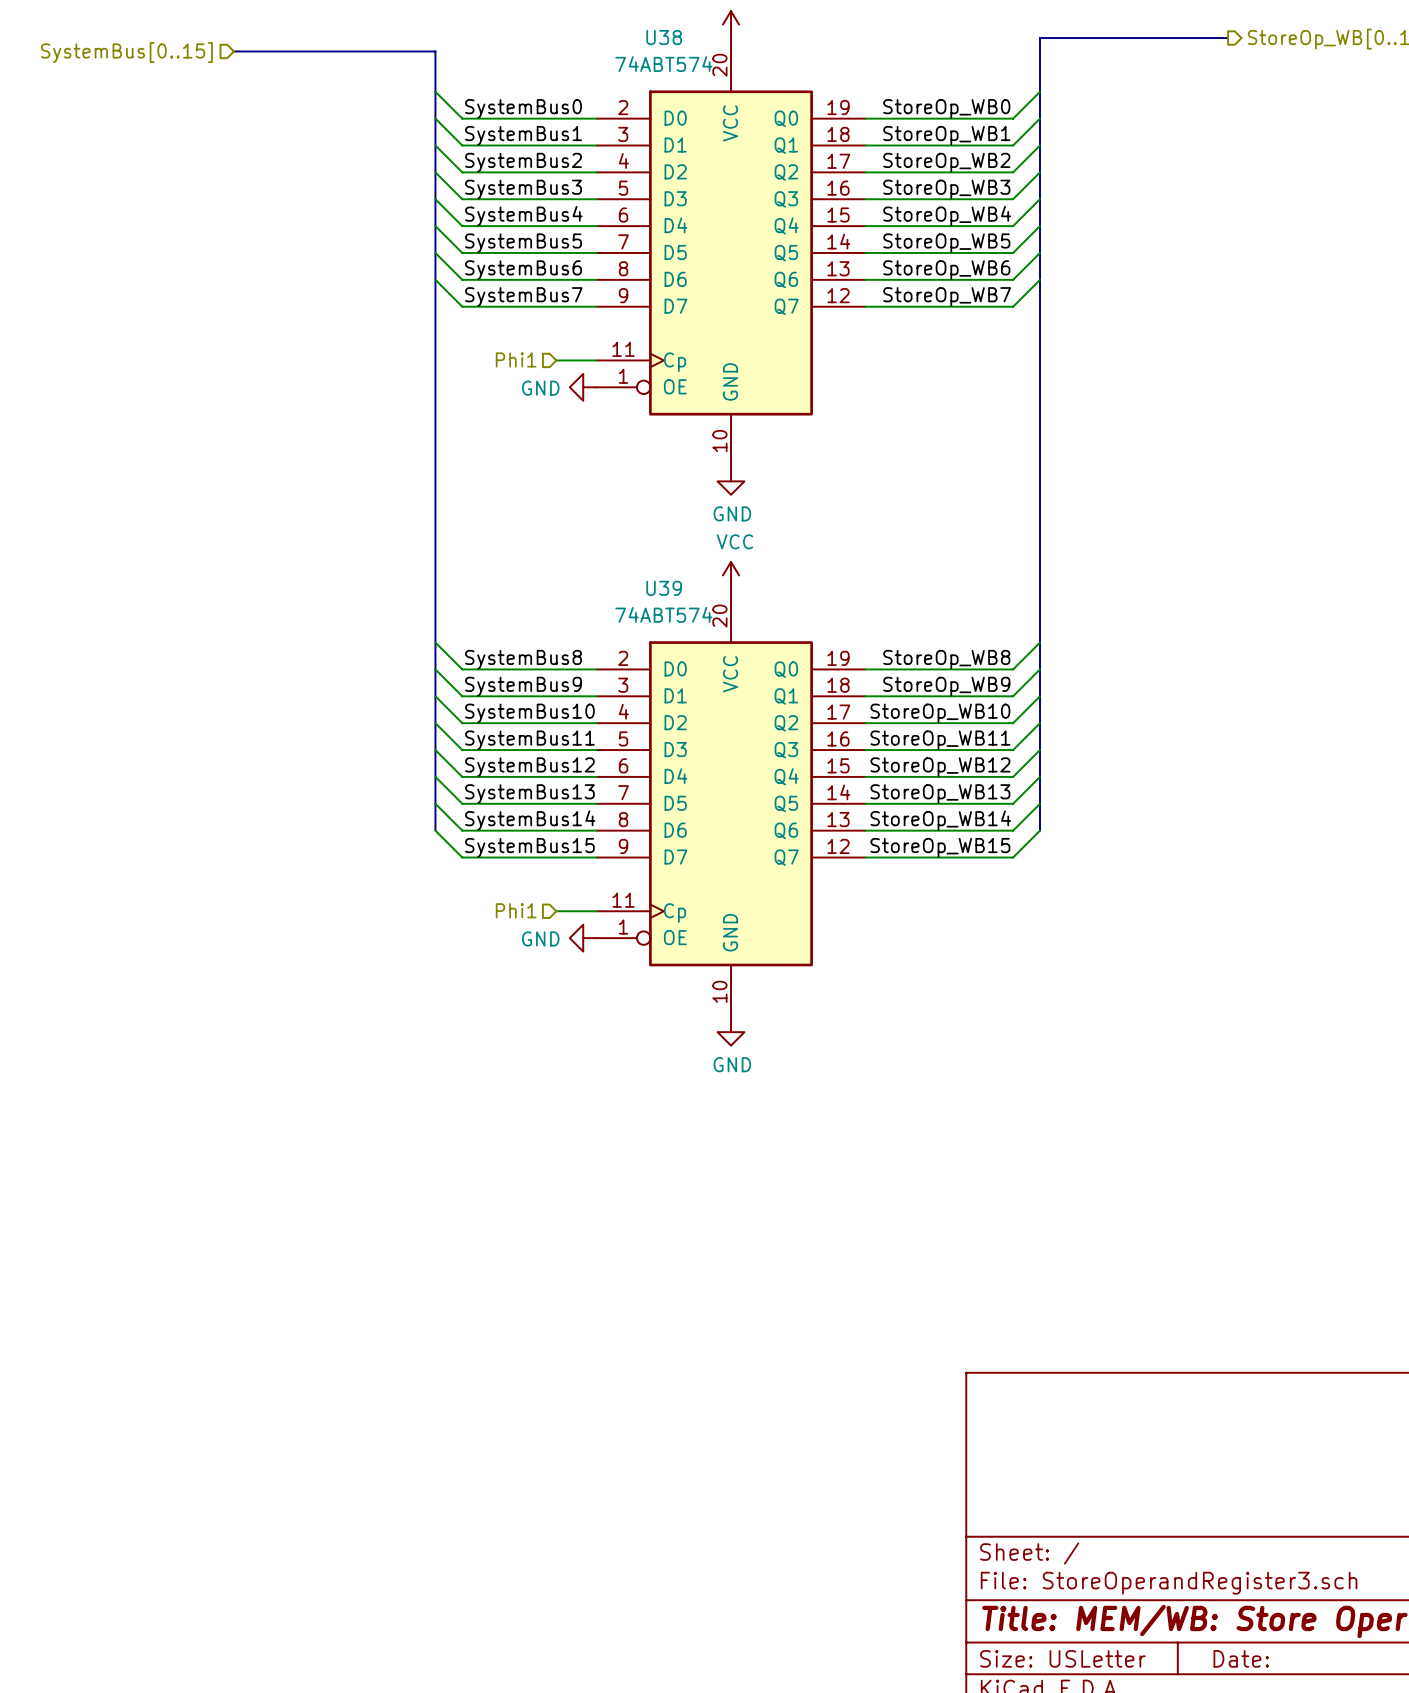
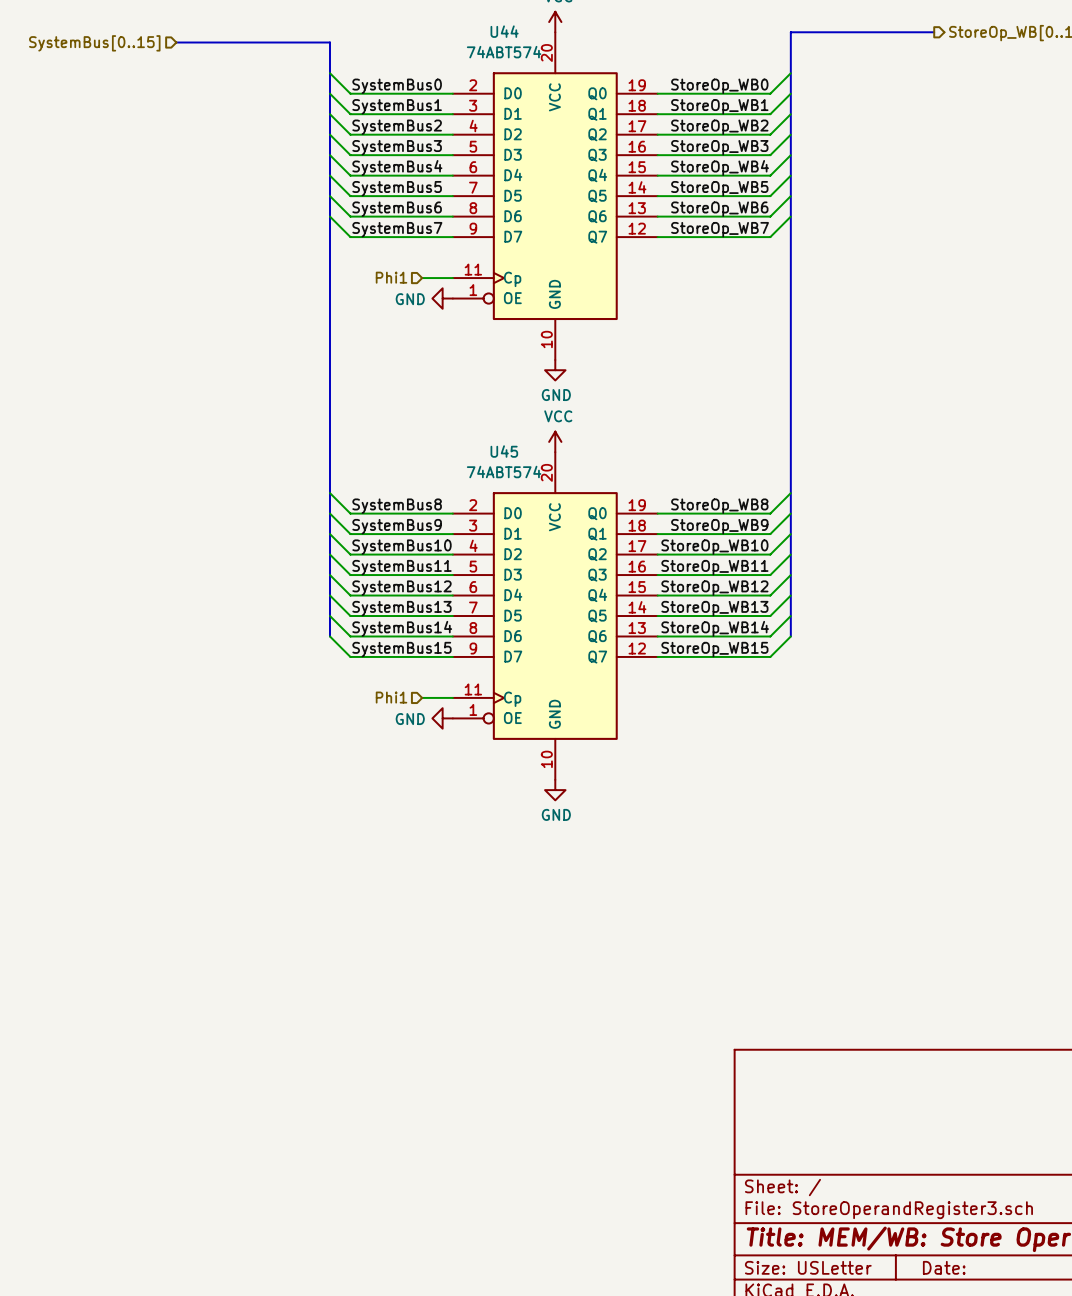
U38 name: U38 (664, 37) -> U44 (504, 31)
U39 name: U39 (664, 588) -> U45 (504, 451)

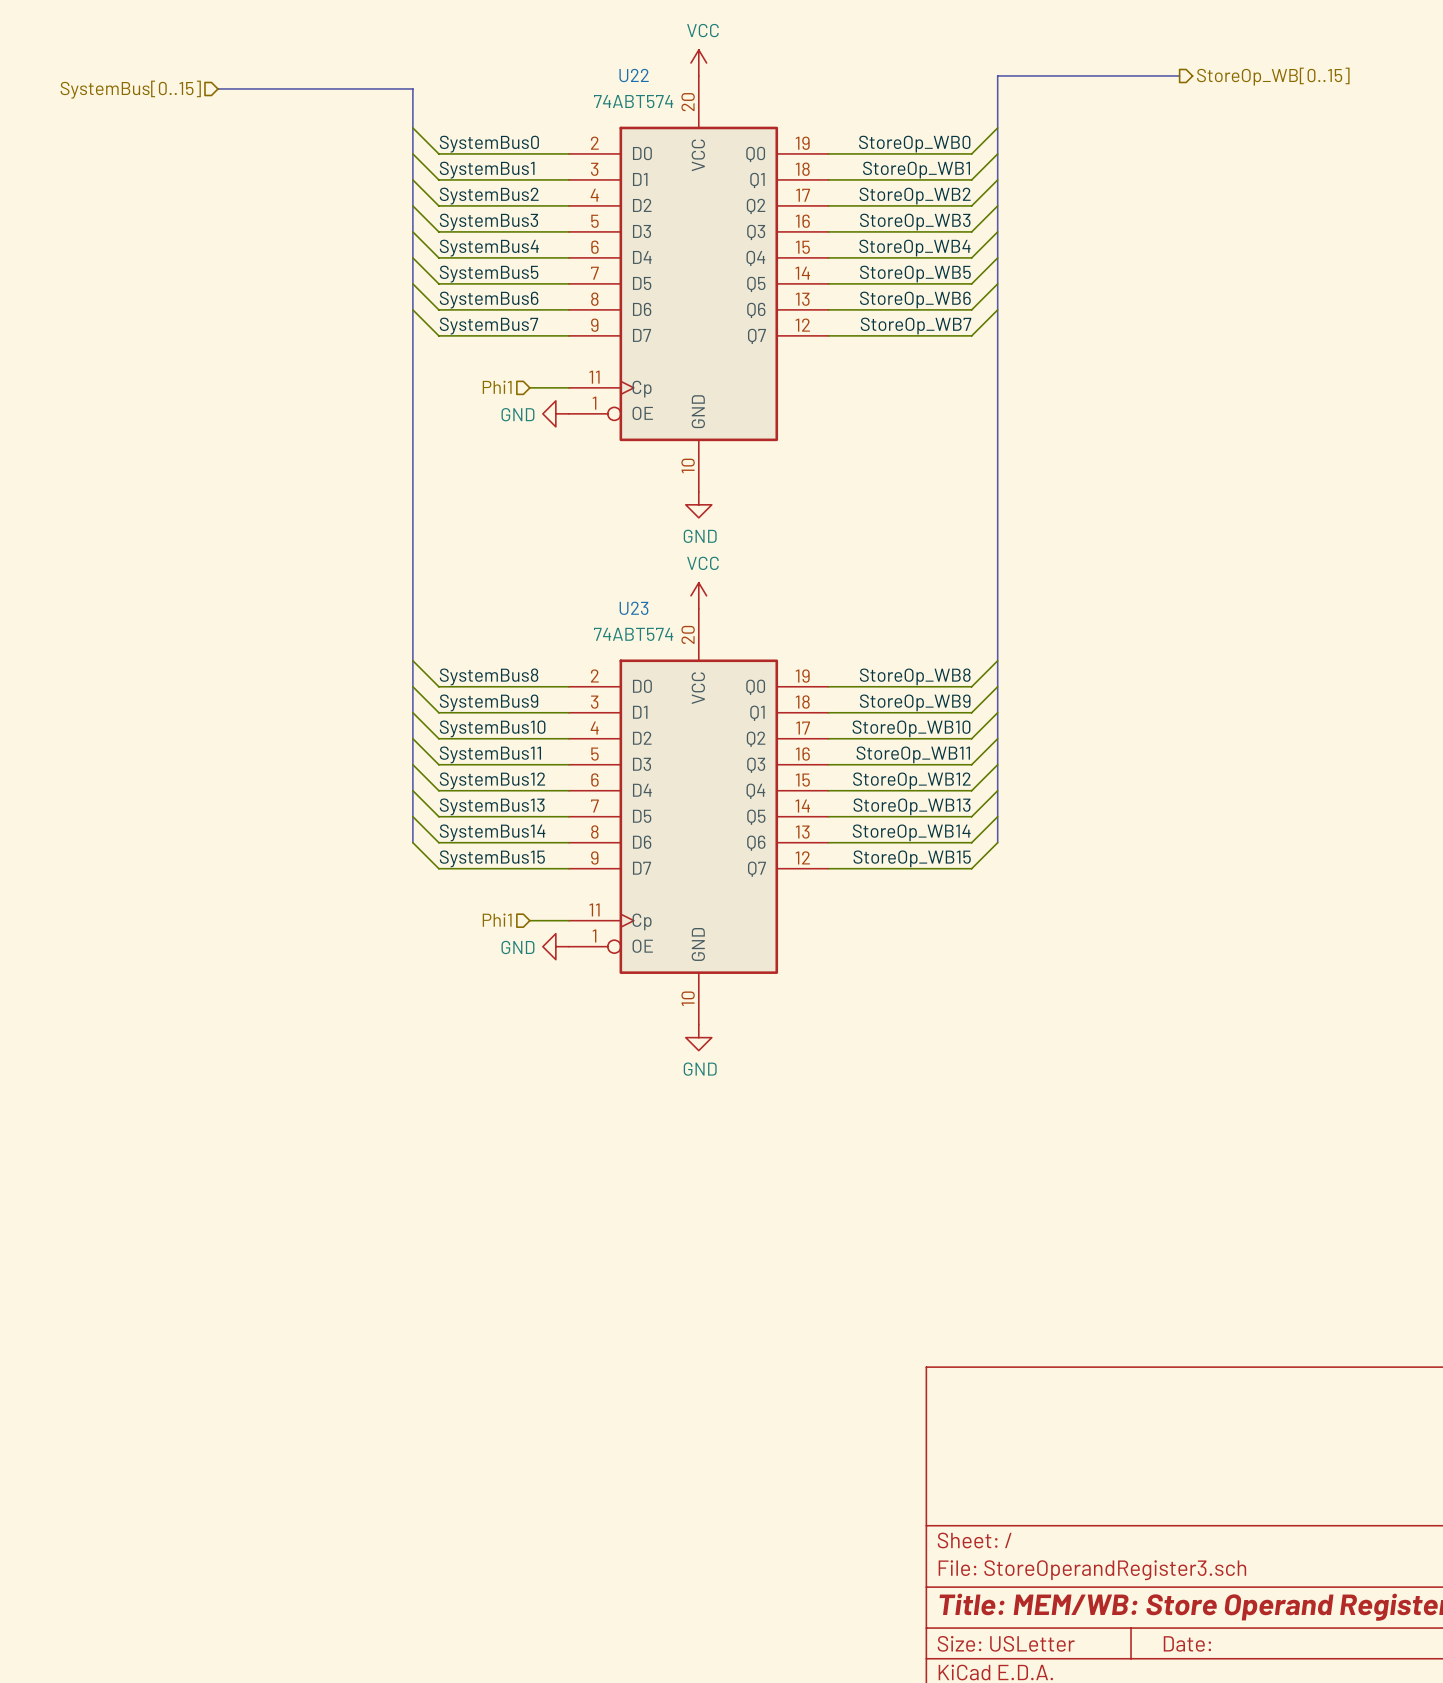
U44 name: U44 (504, 31) -> U22 (634, 75)
U45 name: U45 (504, 451) -> U23 (634, 608)

